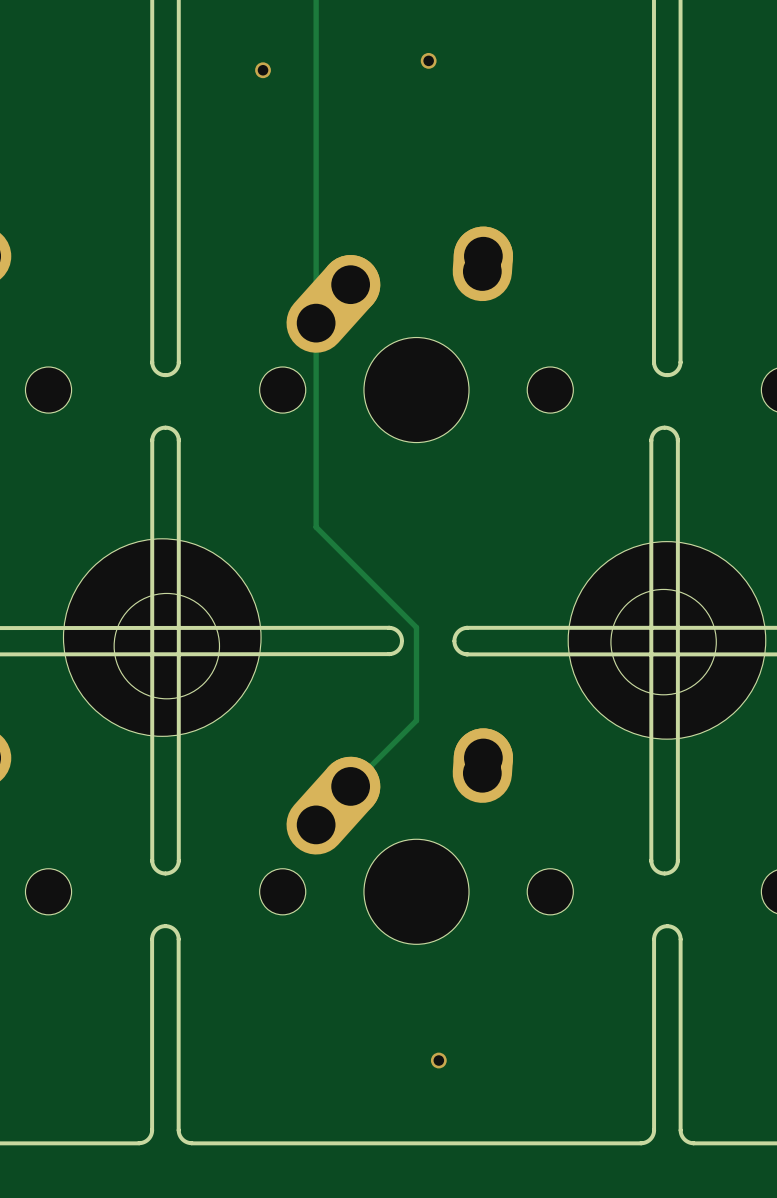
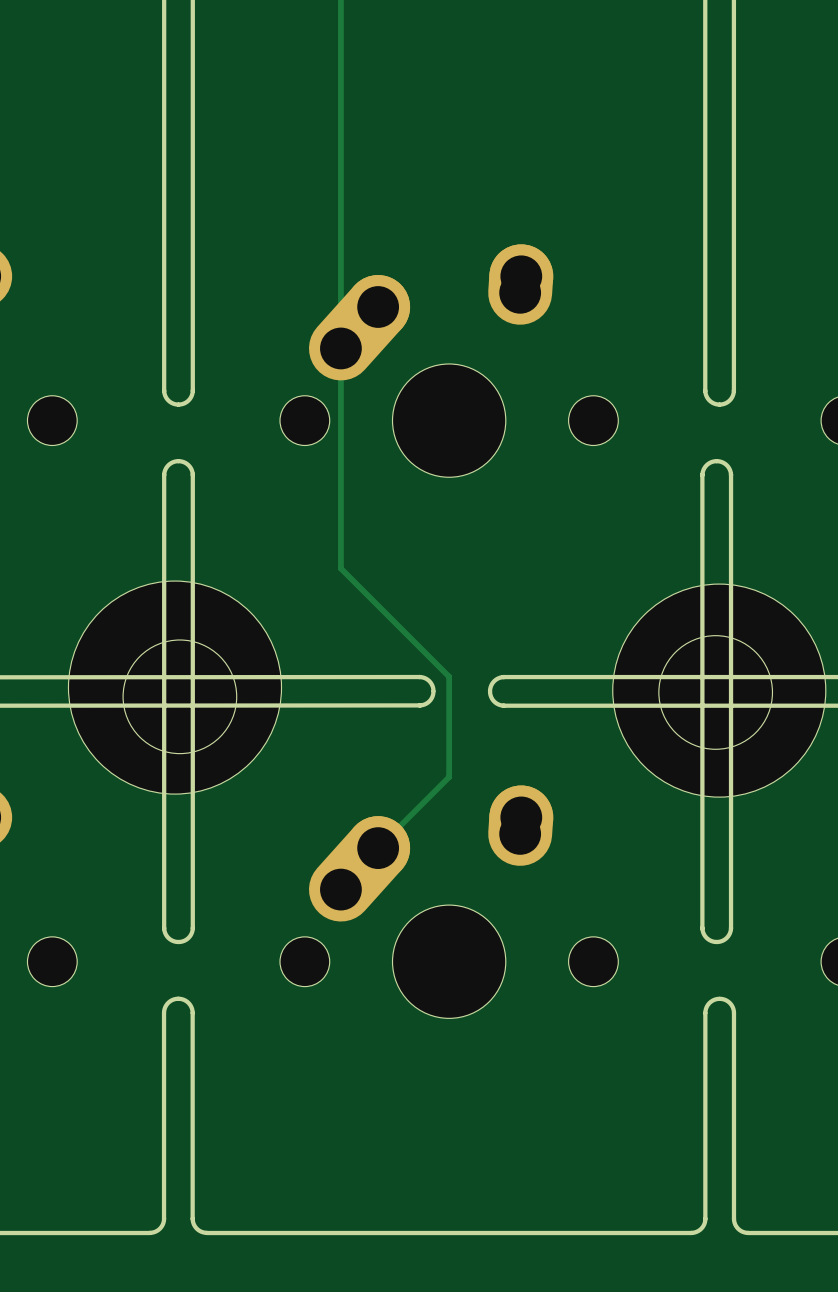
via: (428, 60) -> none
via: (263, 70) -> none
via: (438, 1060) -> none

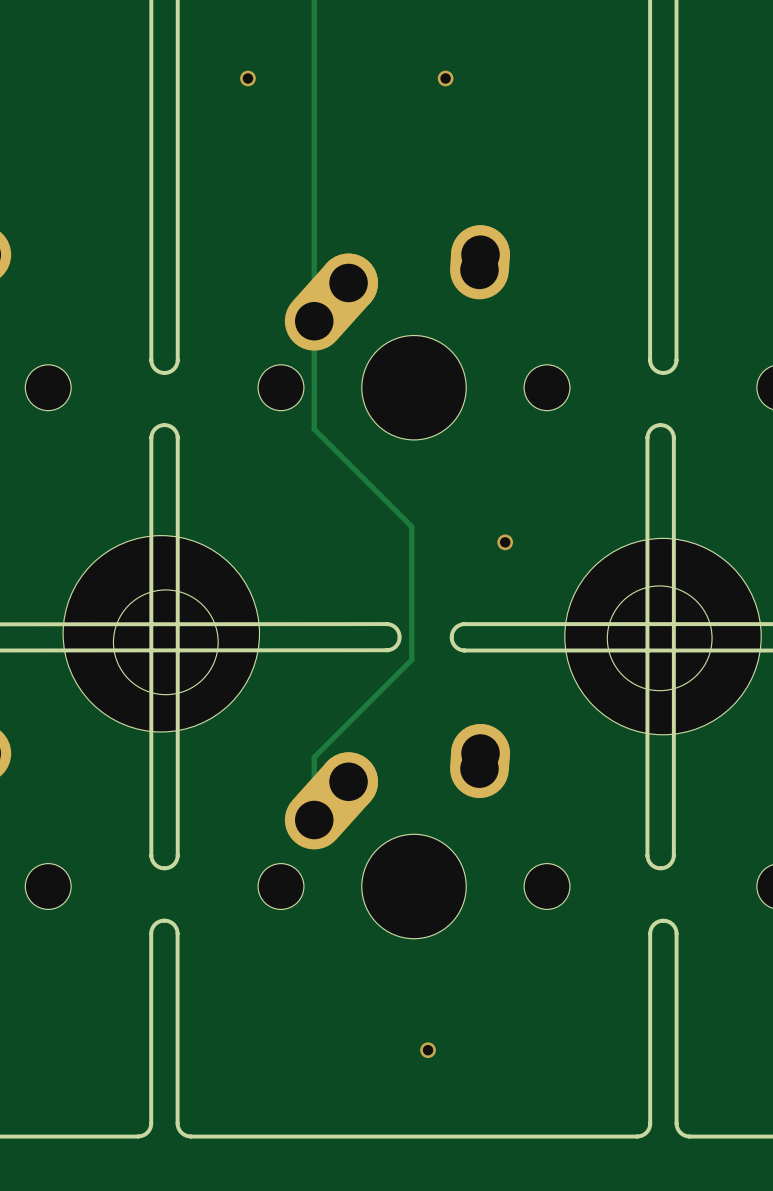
via: none -> (247, 78)
via: none -> (445, 78)
track: (340, 465) (340, 568) (449, 676) (449, 777) (340, 885) -> (314, 429) (411, 526) (411, 659) (314, 757) (314, 816)
via: none -> (505, 542)
via: none -> (428, 1050)

